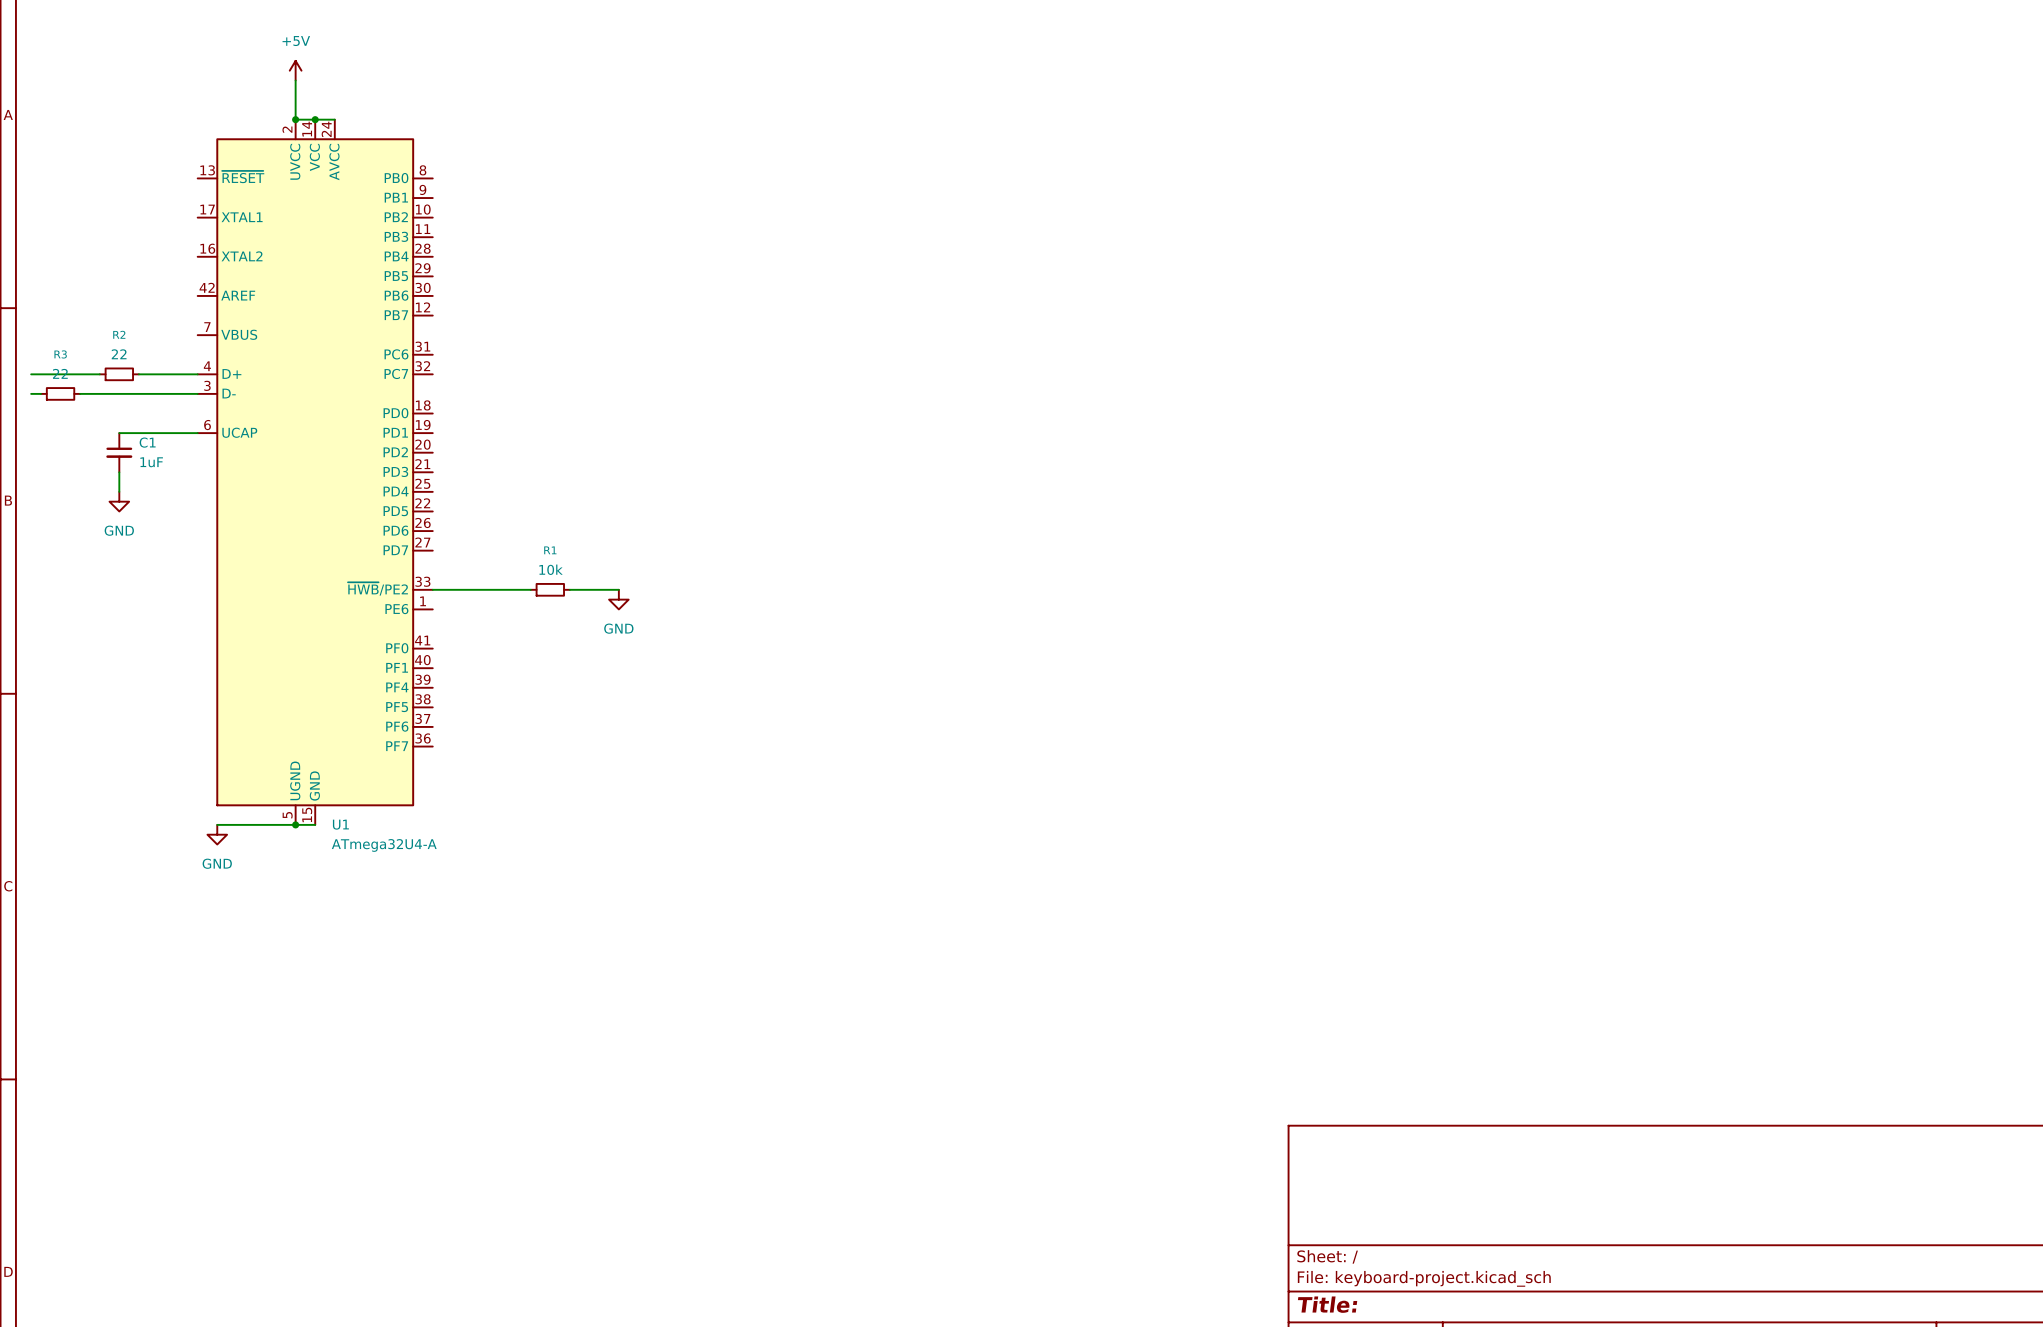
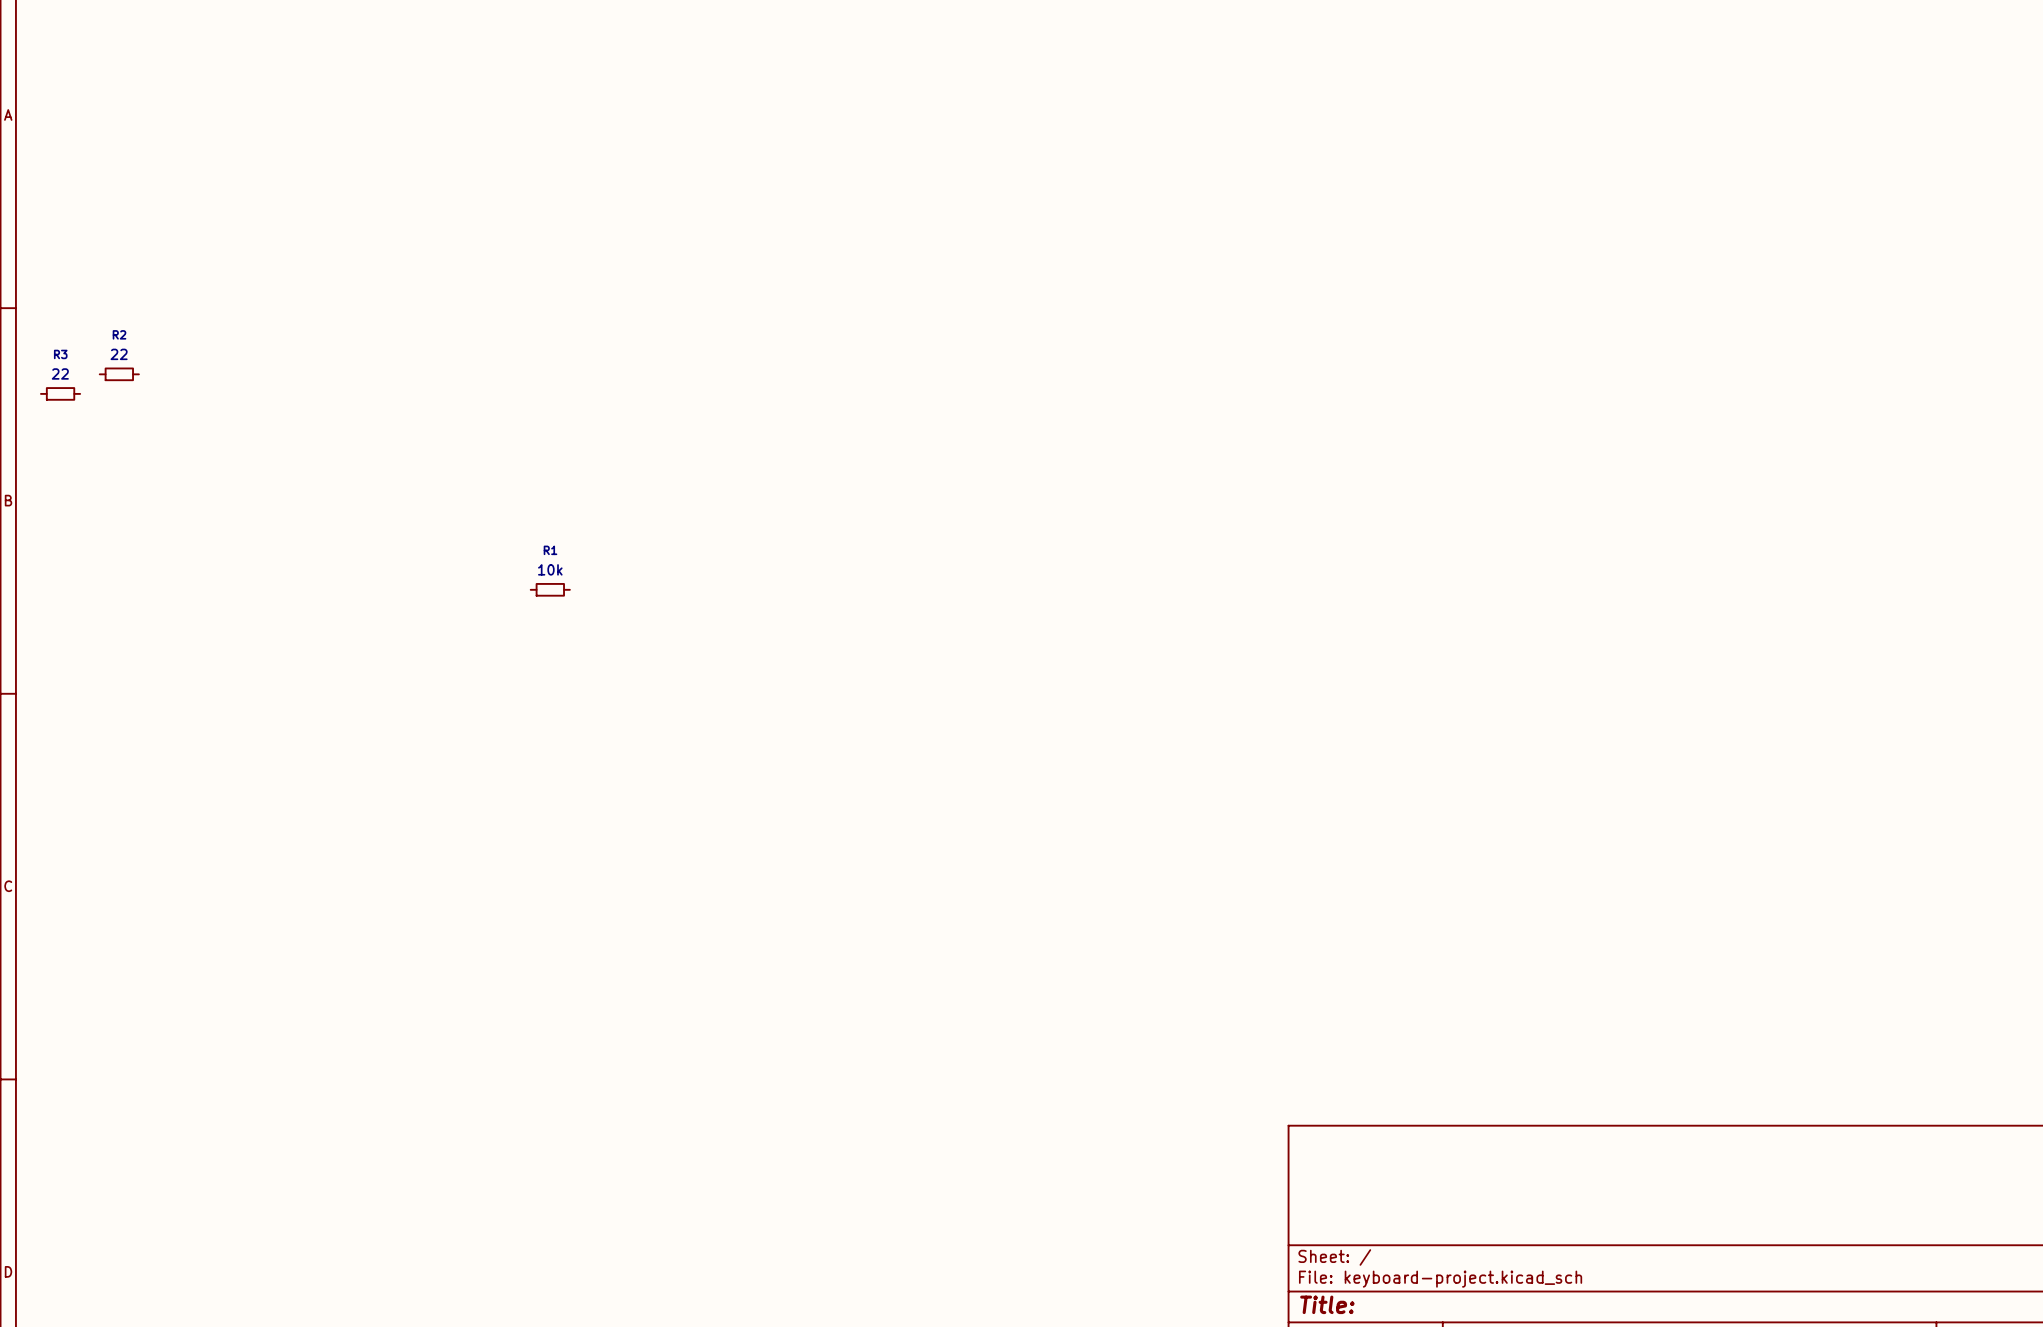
power symbol: +5V (295, 70) -> none
wire: (295, 80) (295, 119) (334, 119) -> none
junction: (295, 119) -> none
junction: (315, 119) -> none
wire: (31, 374) (99, 374) -> none
wire: (138, 374) (197, 374) -> none
wire: (31, 393) (40, 393) -> none
wire: (80, 393) (197, 393) -> none
wire: (119, 433) (197, 433) -> none
C1: 1uF (119, 452) -> none
wire: (119, 472) (119, 491) -> none
U1: ATmega32U4-A (315, 472) -> none
power symbol: GND (119, 501) -> none
wire: (432, 589) (530, 589) -> none
wire: (569, 589) (618, 589) -> none
power symbol: GND (618, 599) -> none
wire: (217, 824) (315, 824) -> none
junction: (295, 824) -> none
power symbol: GND (217, 834) -> none

